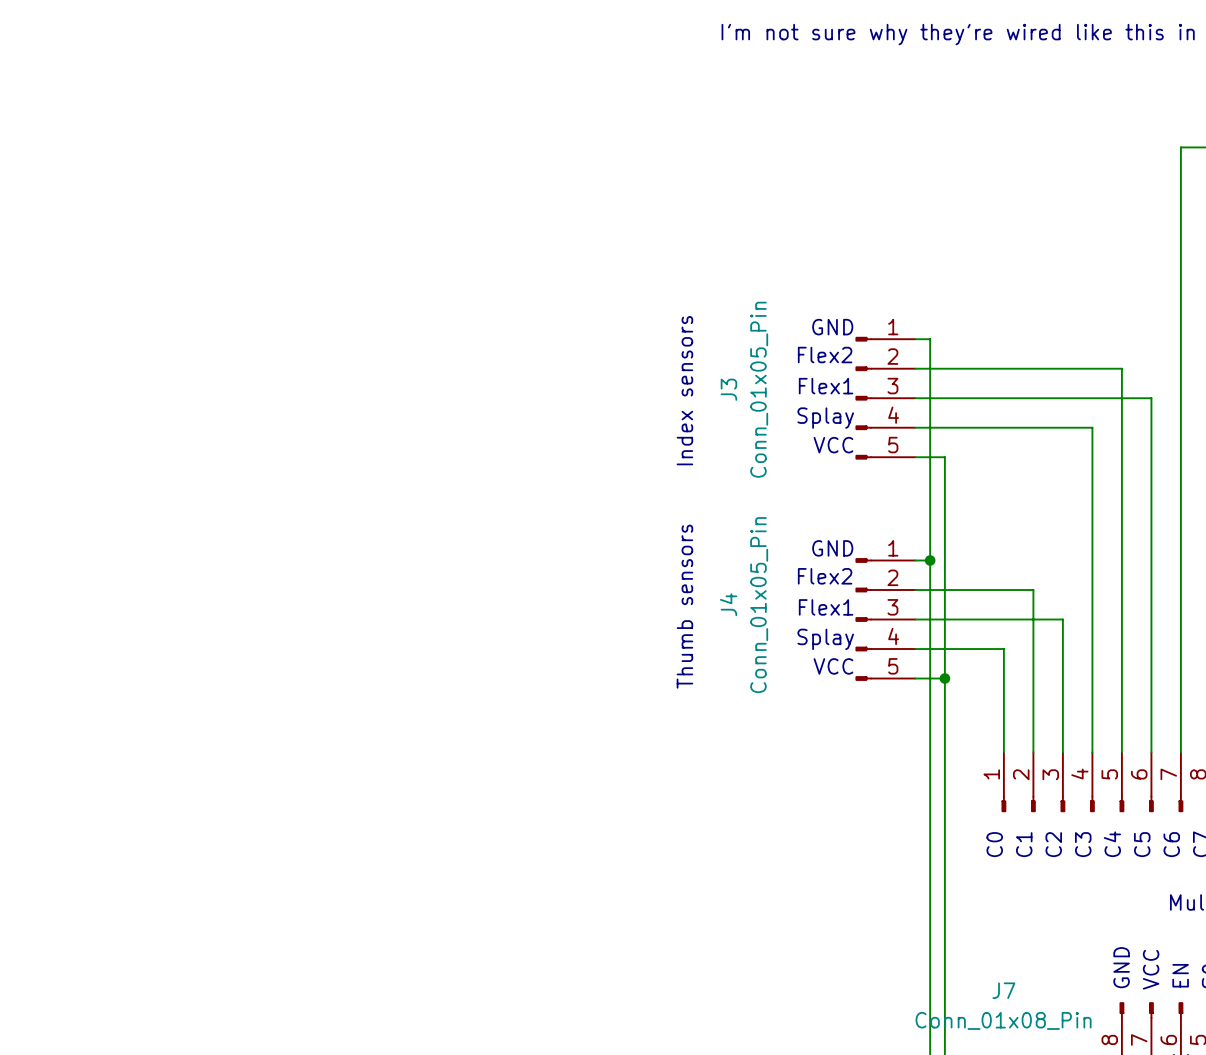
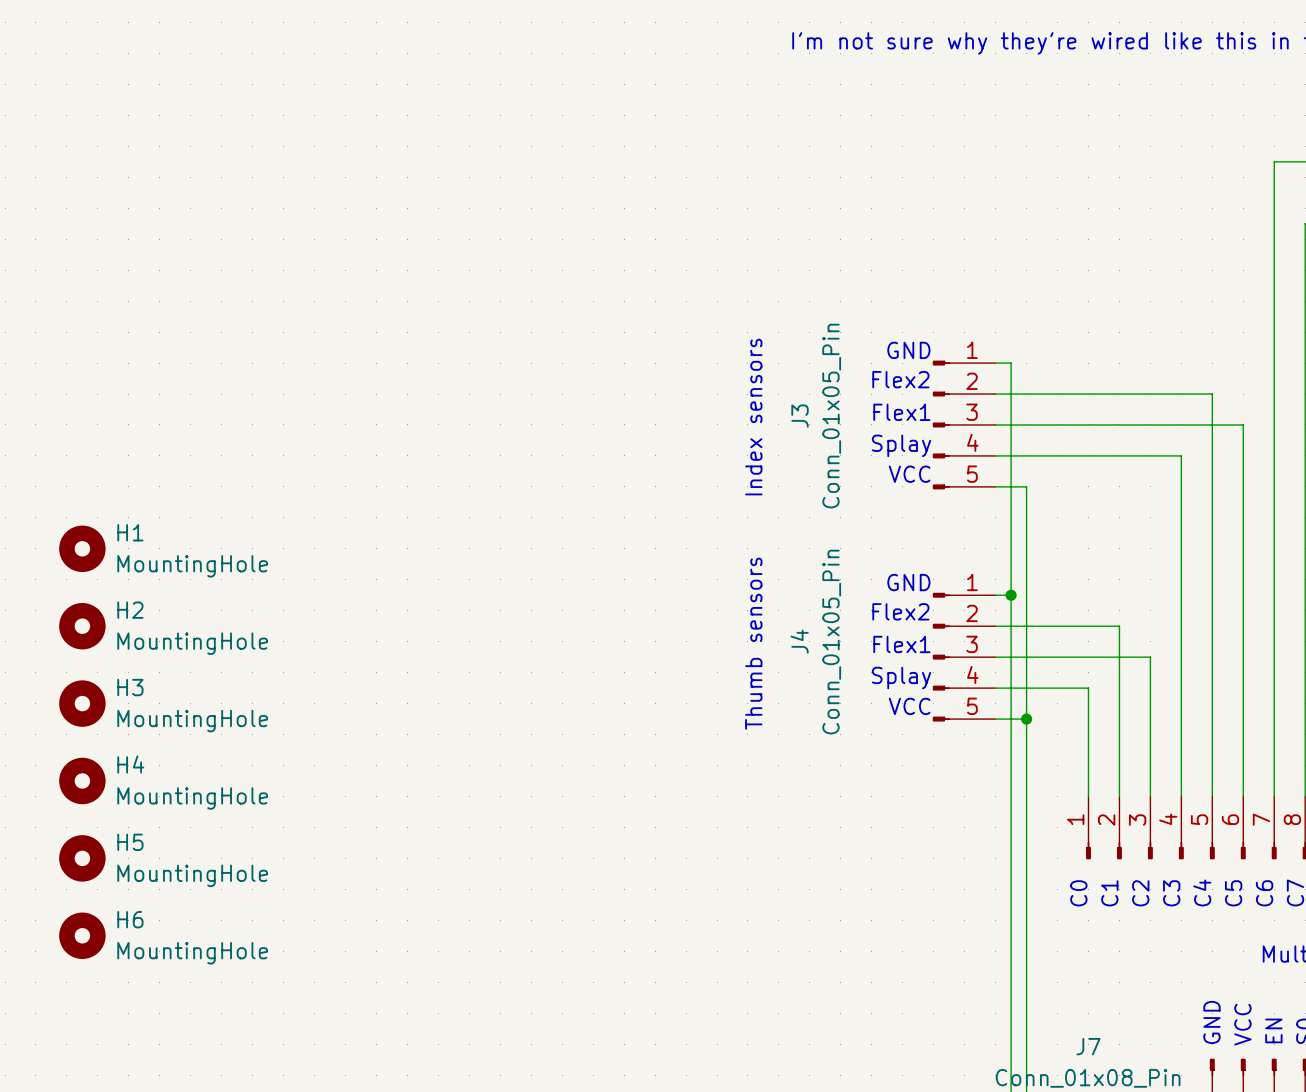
H1: none -> MountingHole (82, 548)
H2: none -> MountingHole (82, 626)
H3: none -> MountingHole (82, 703)
H4: none -> MountingHole (82, 780)
H5: none -> MountingHole (82, 858)
H6: none -> MountingHole (82, 935)

